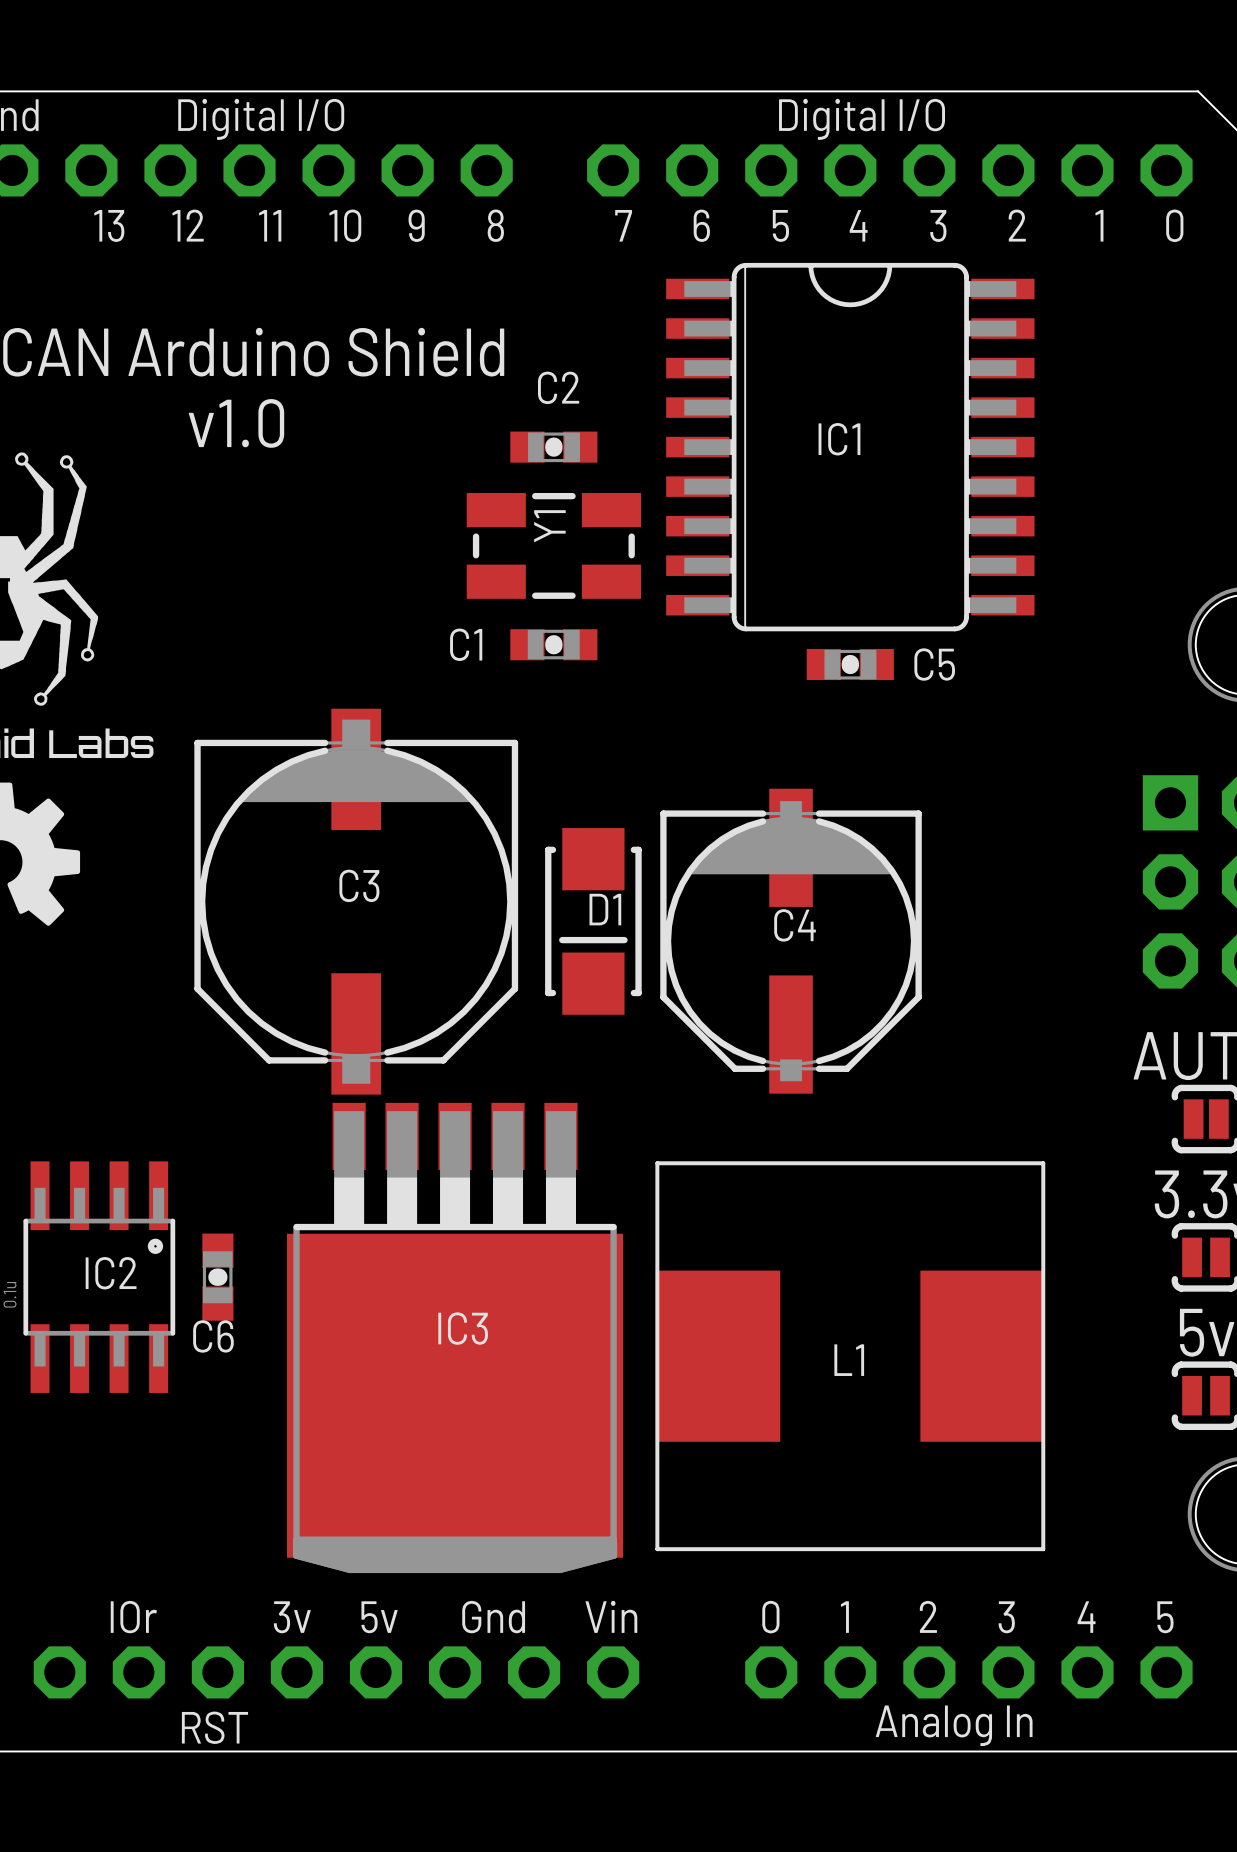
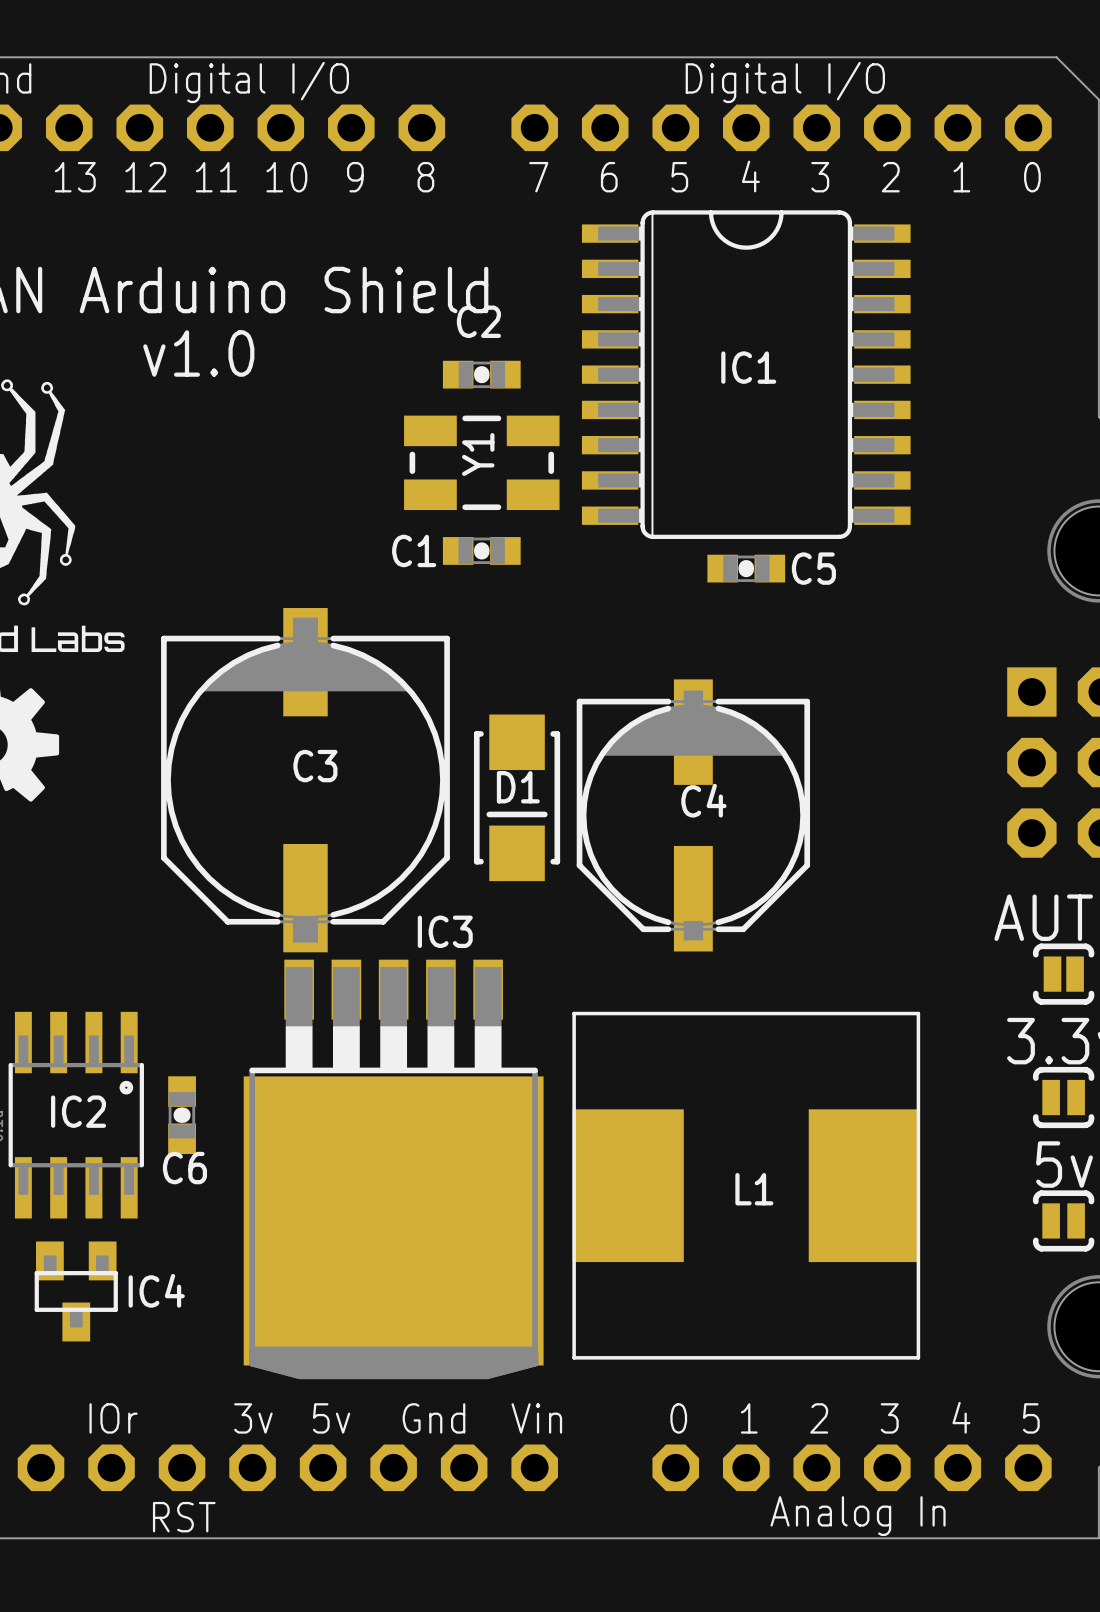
IC3 name position: IC3 (463, 1328) -> IC3 (445, 931)
IC4: none -> (76, 1291)

